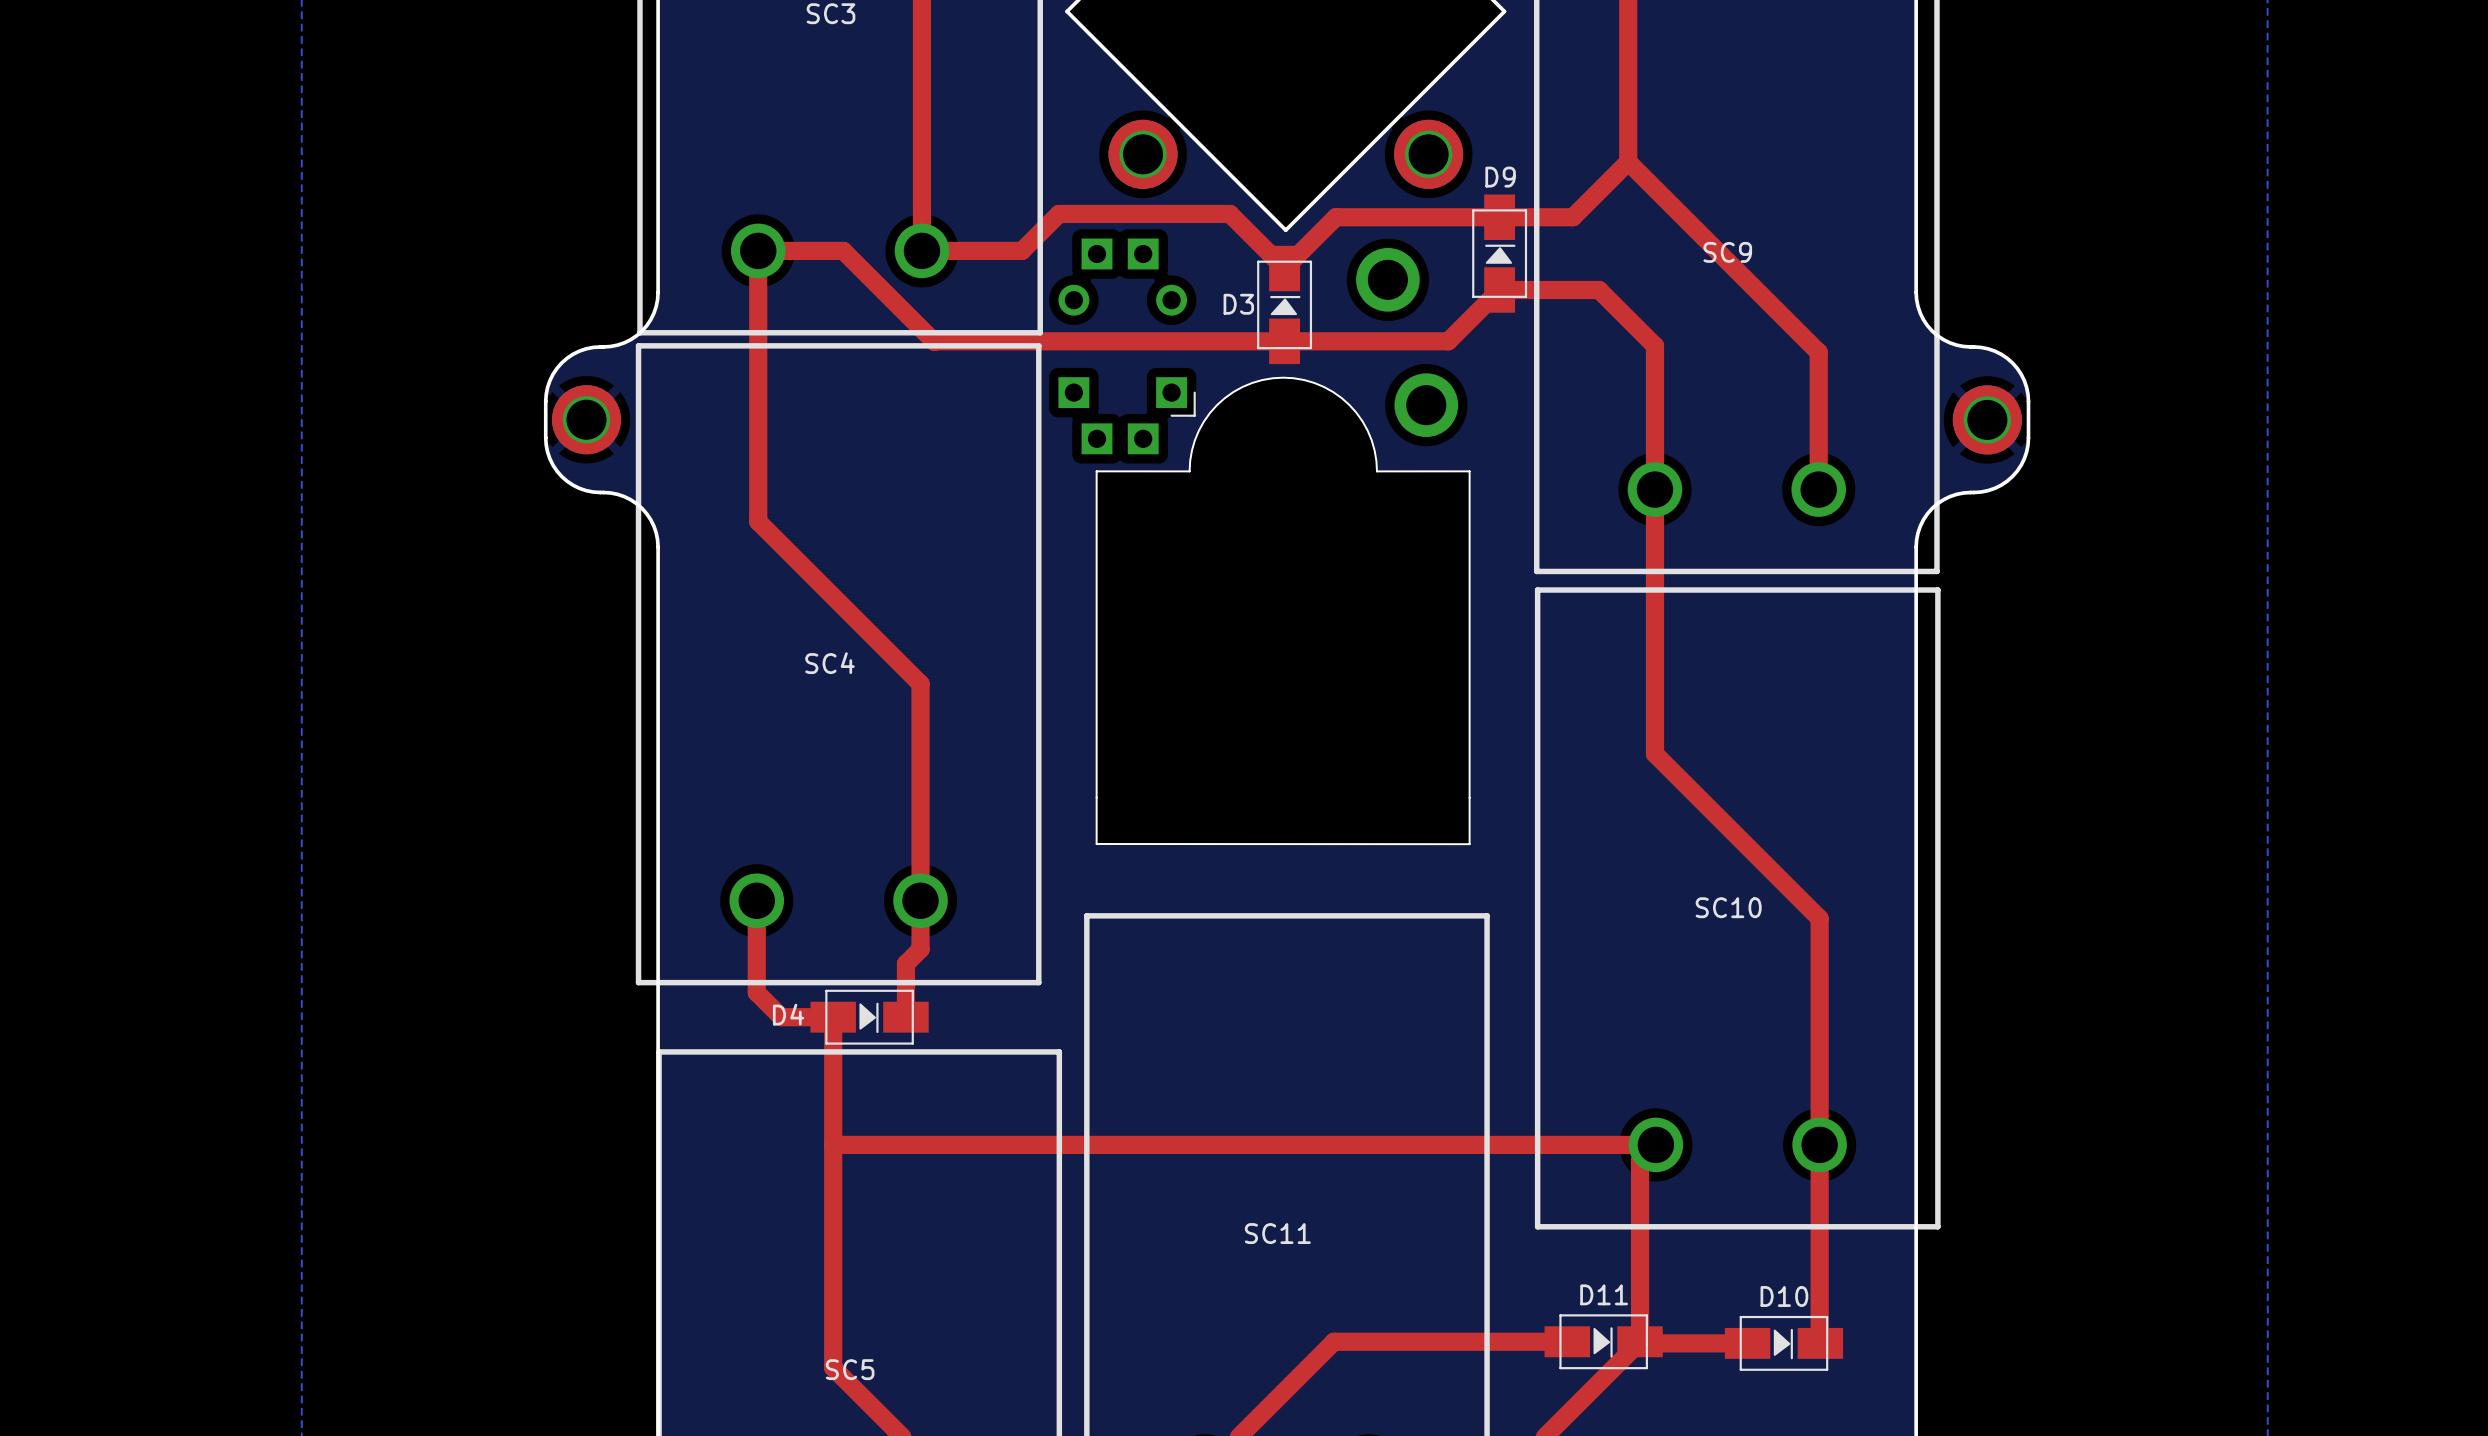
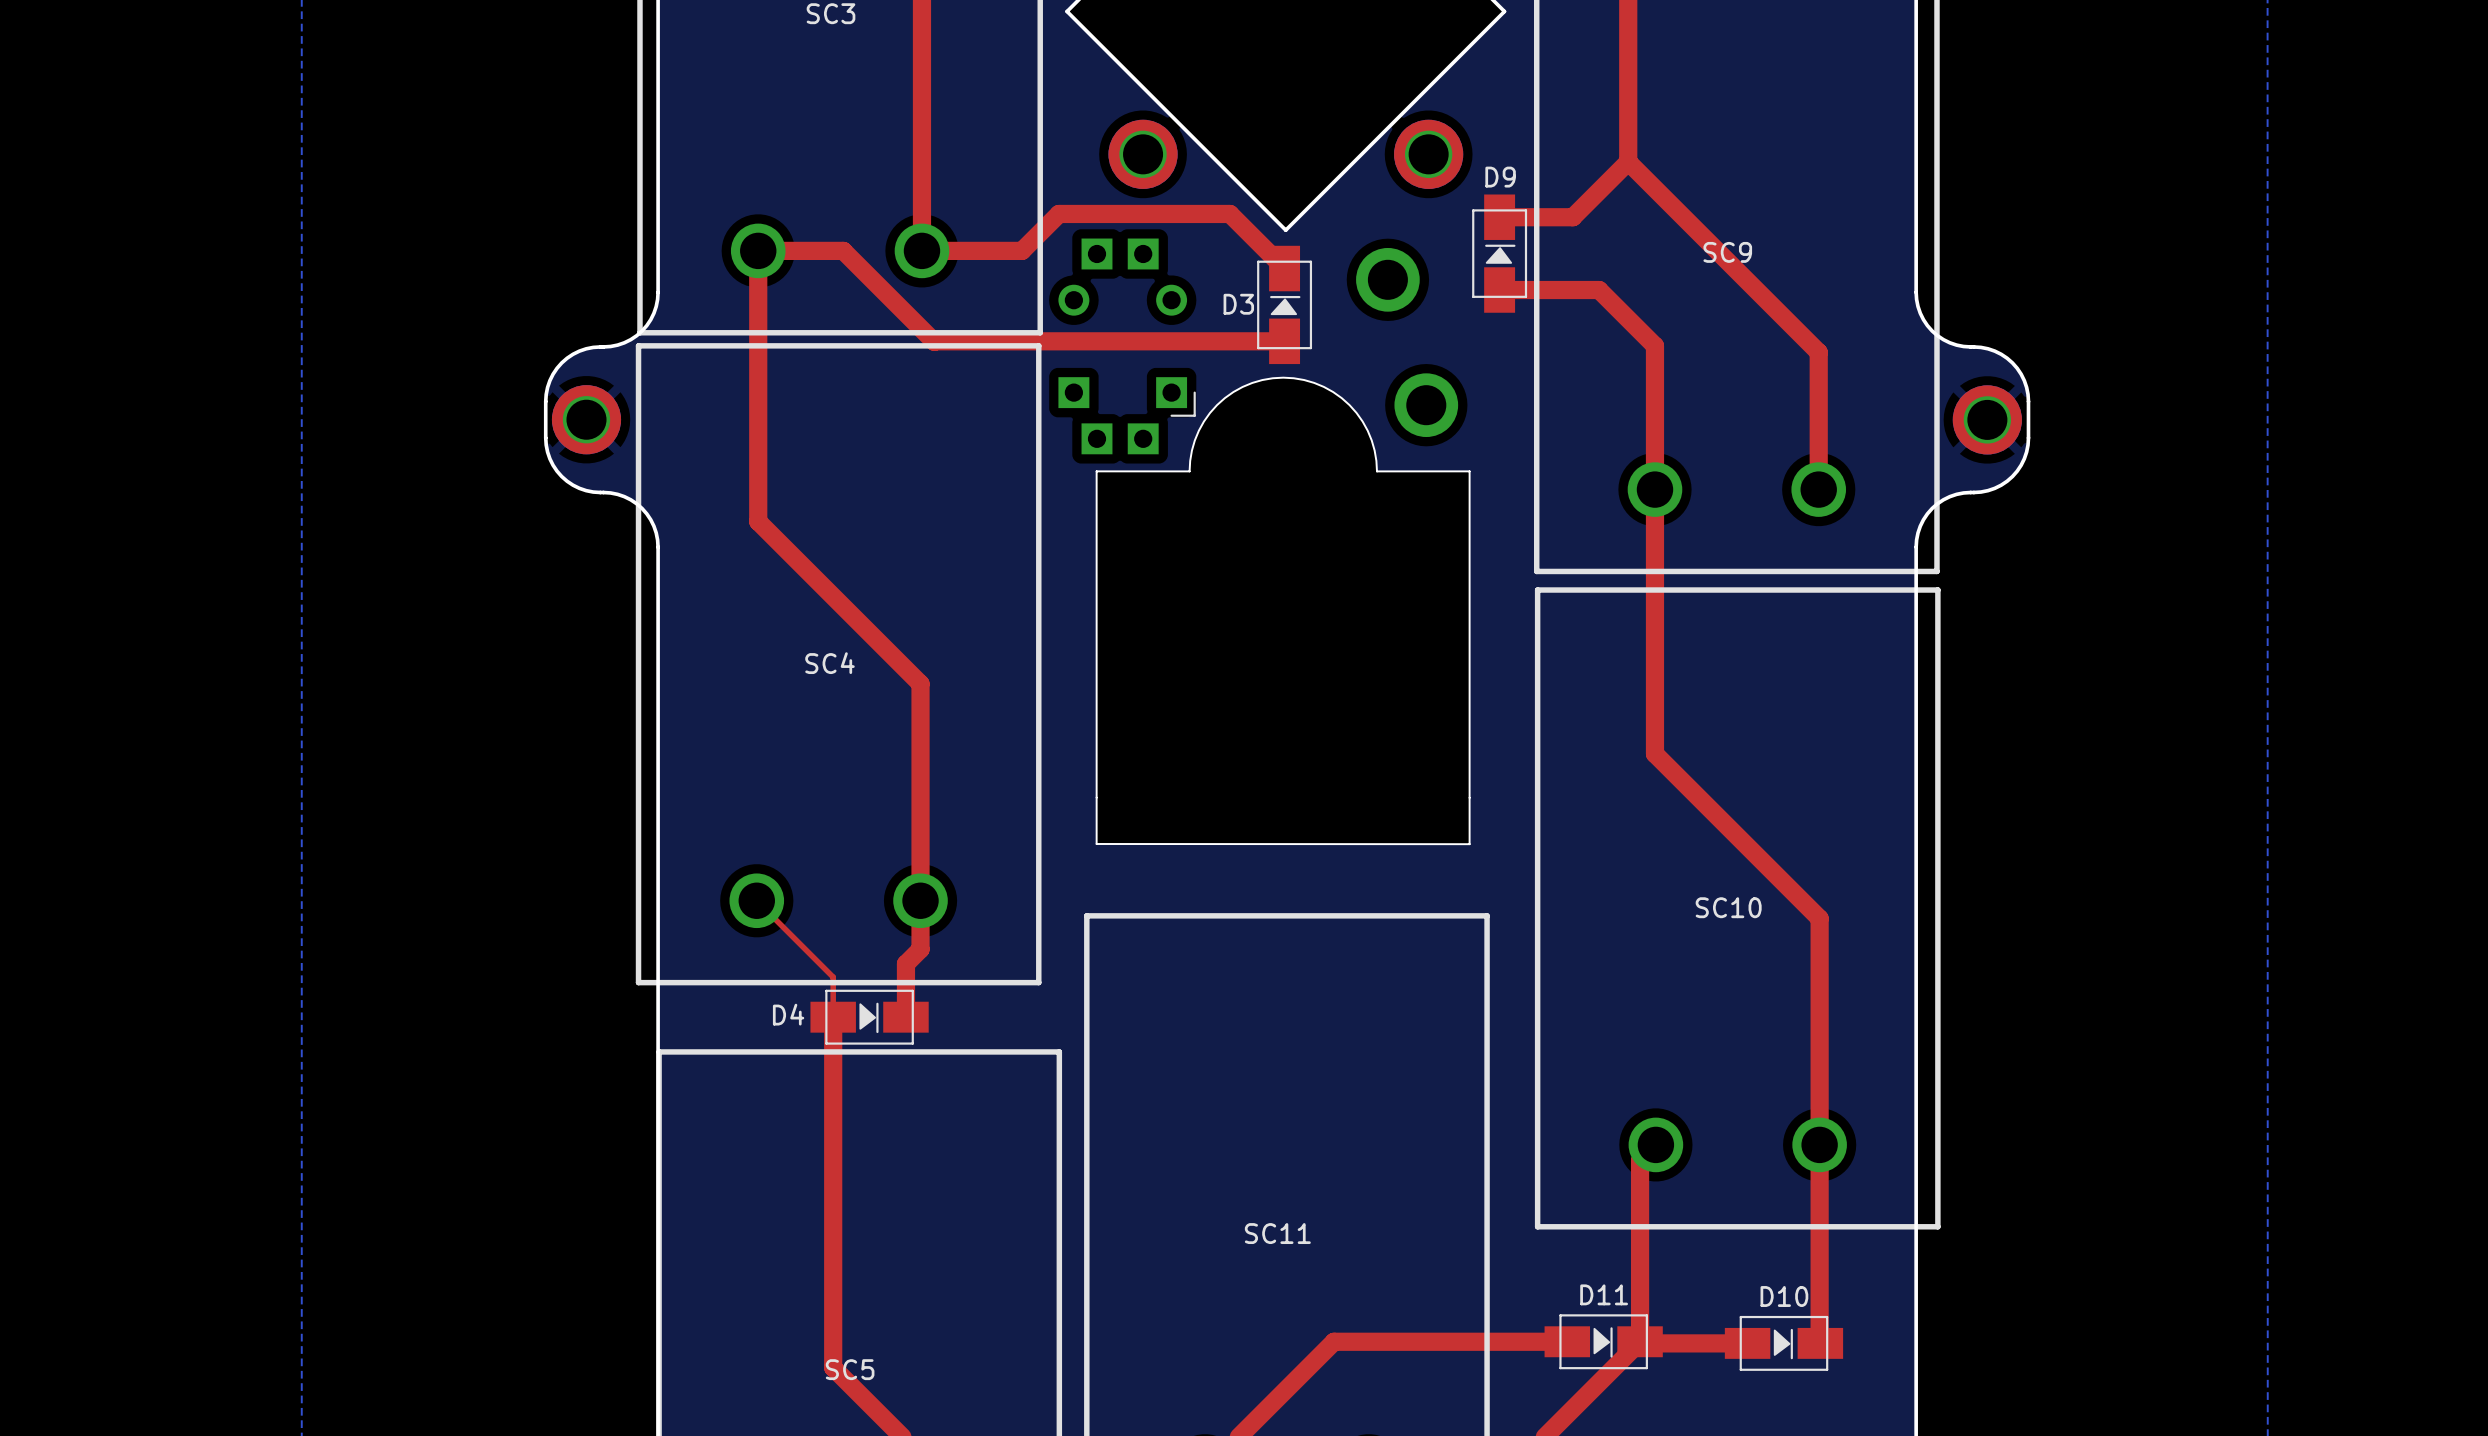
top track: (1499, 217) (1335, 217) (1284, 268) -> none
top track: (1499, 290) (1448, 341) (1284, 341) -> none
top track: (756, 900) (756, 992) (781, 1017) (833, 1017) -> (756, 900) (833, 977) (833, 1017)
top track: (1655, 1144) (833, 1145) -> none

